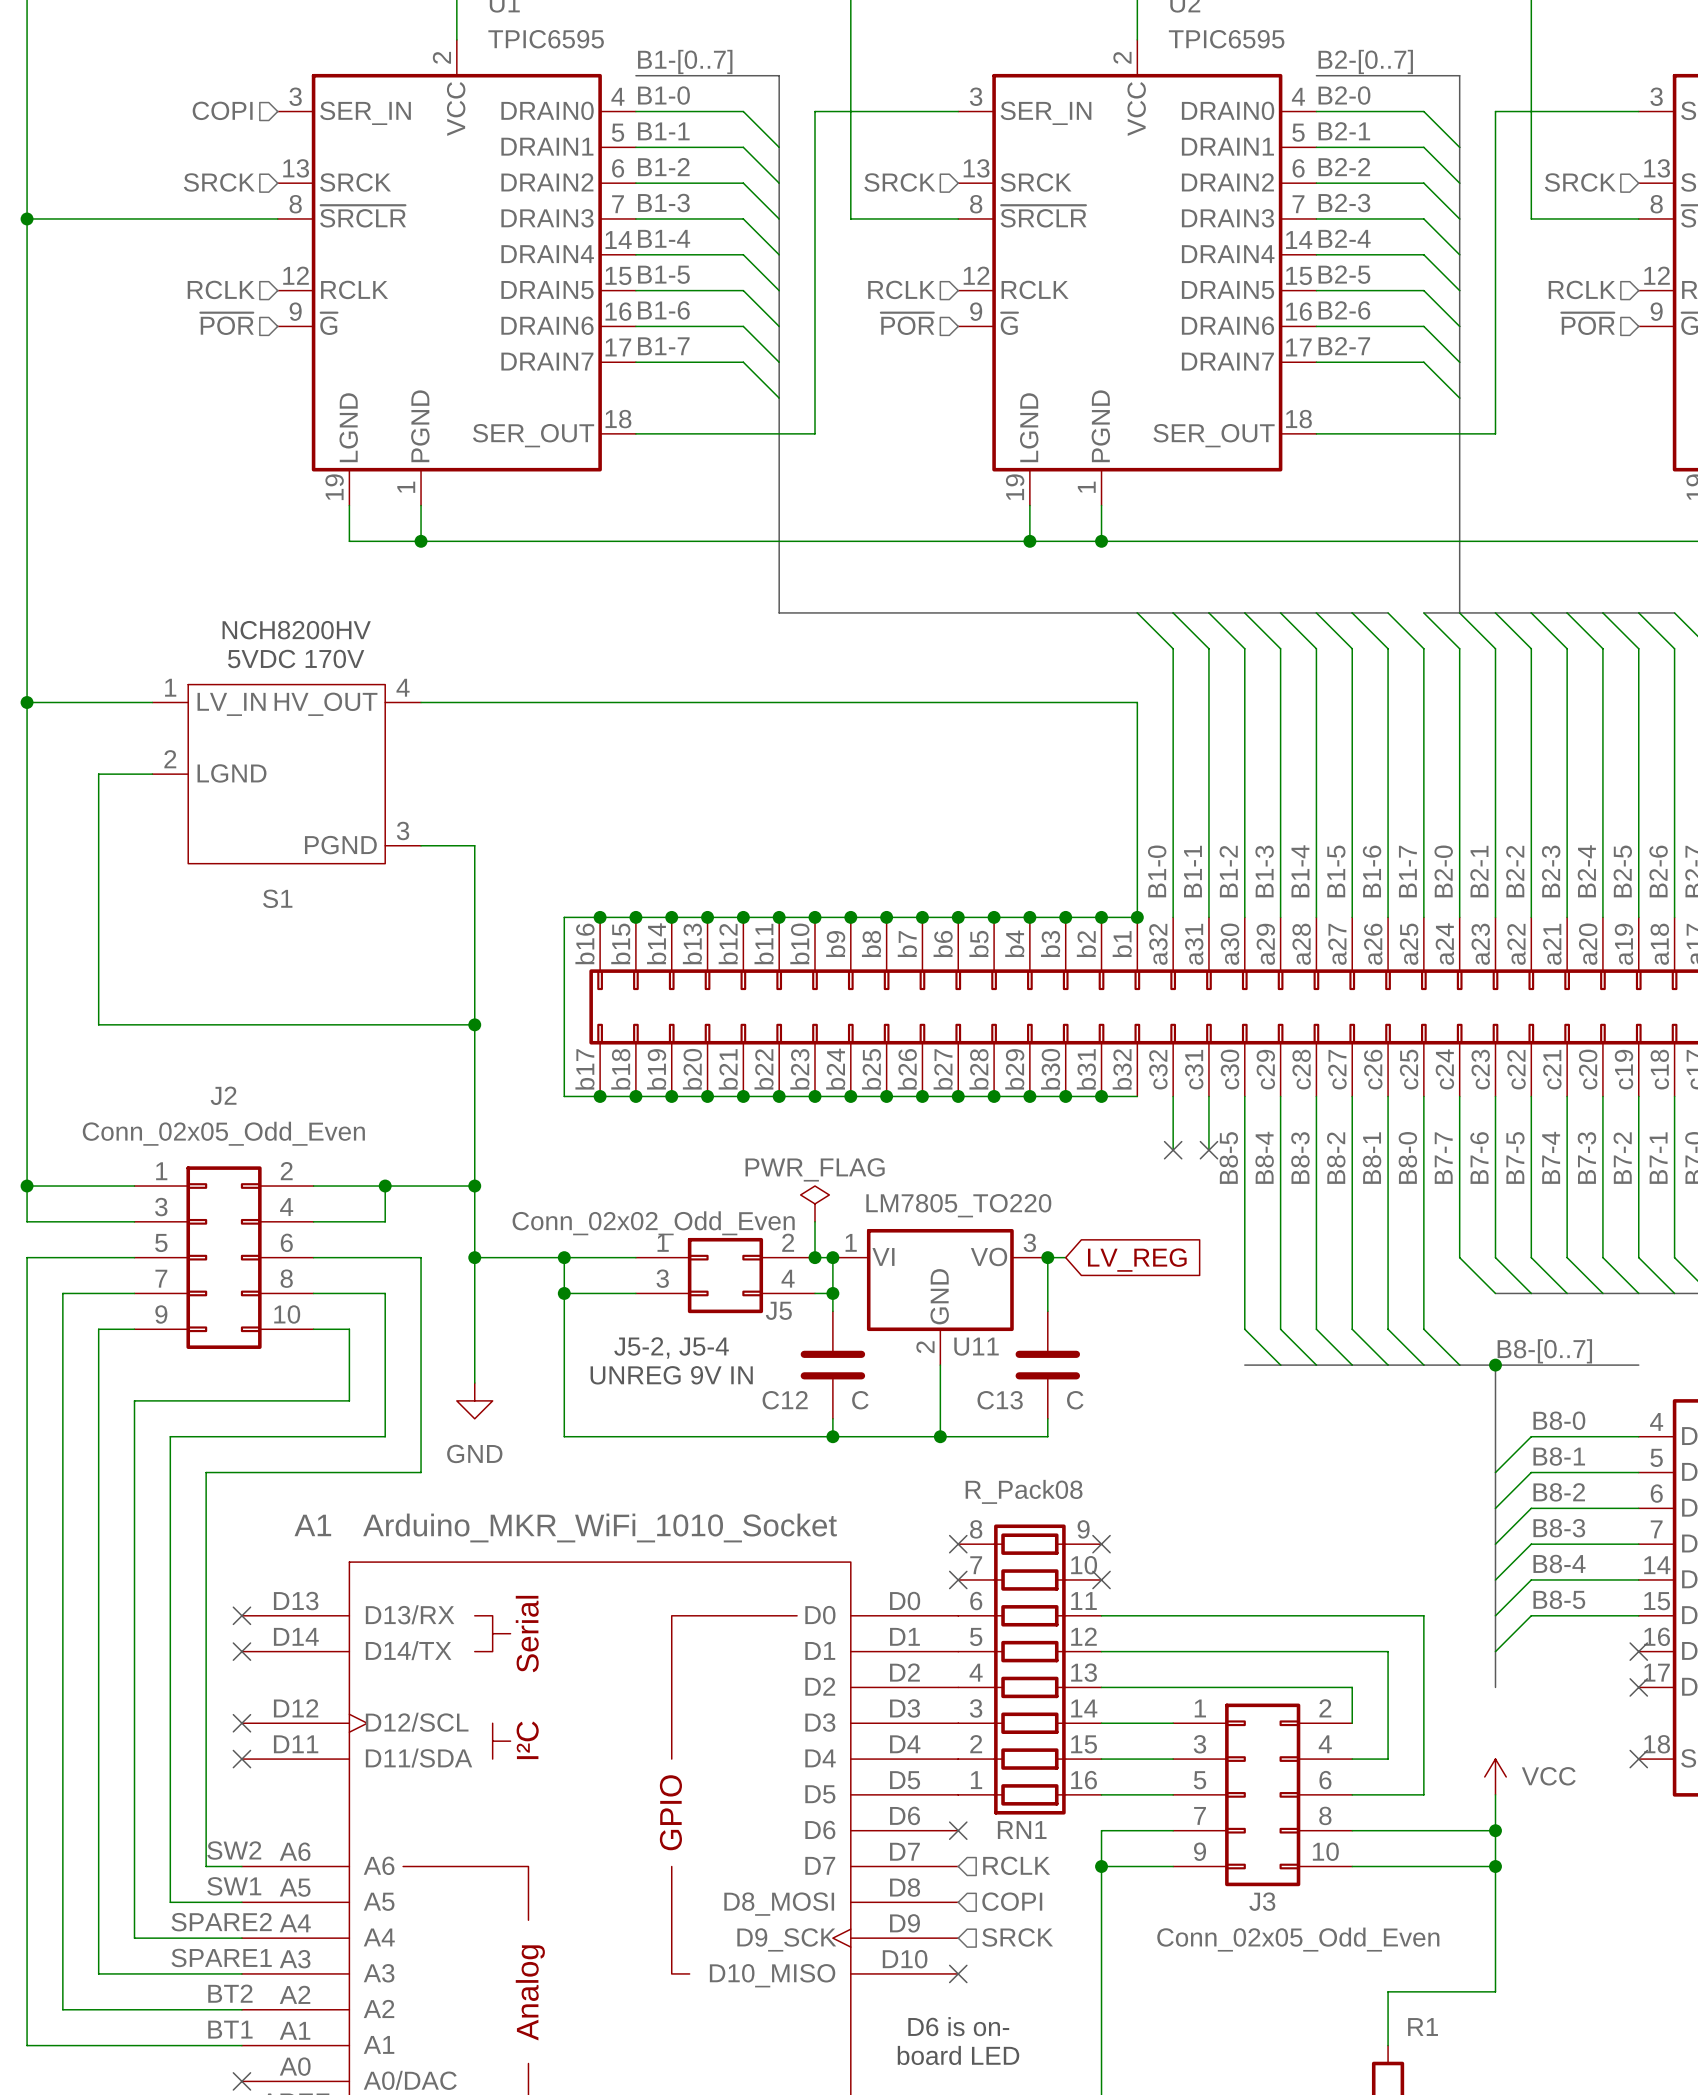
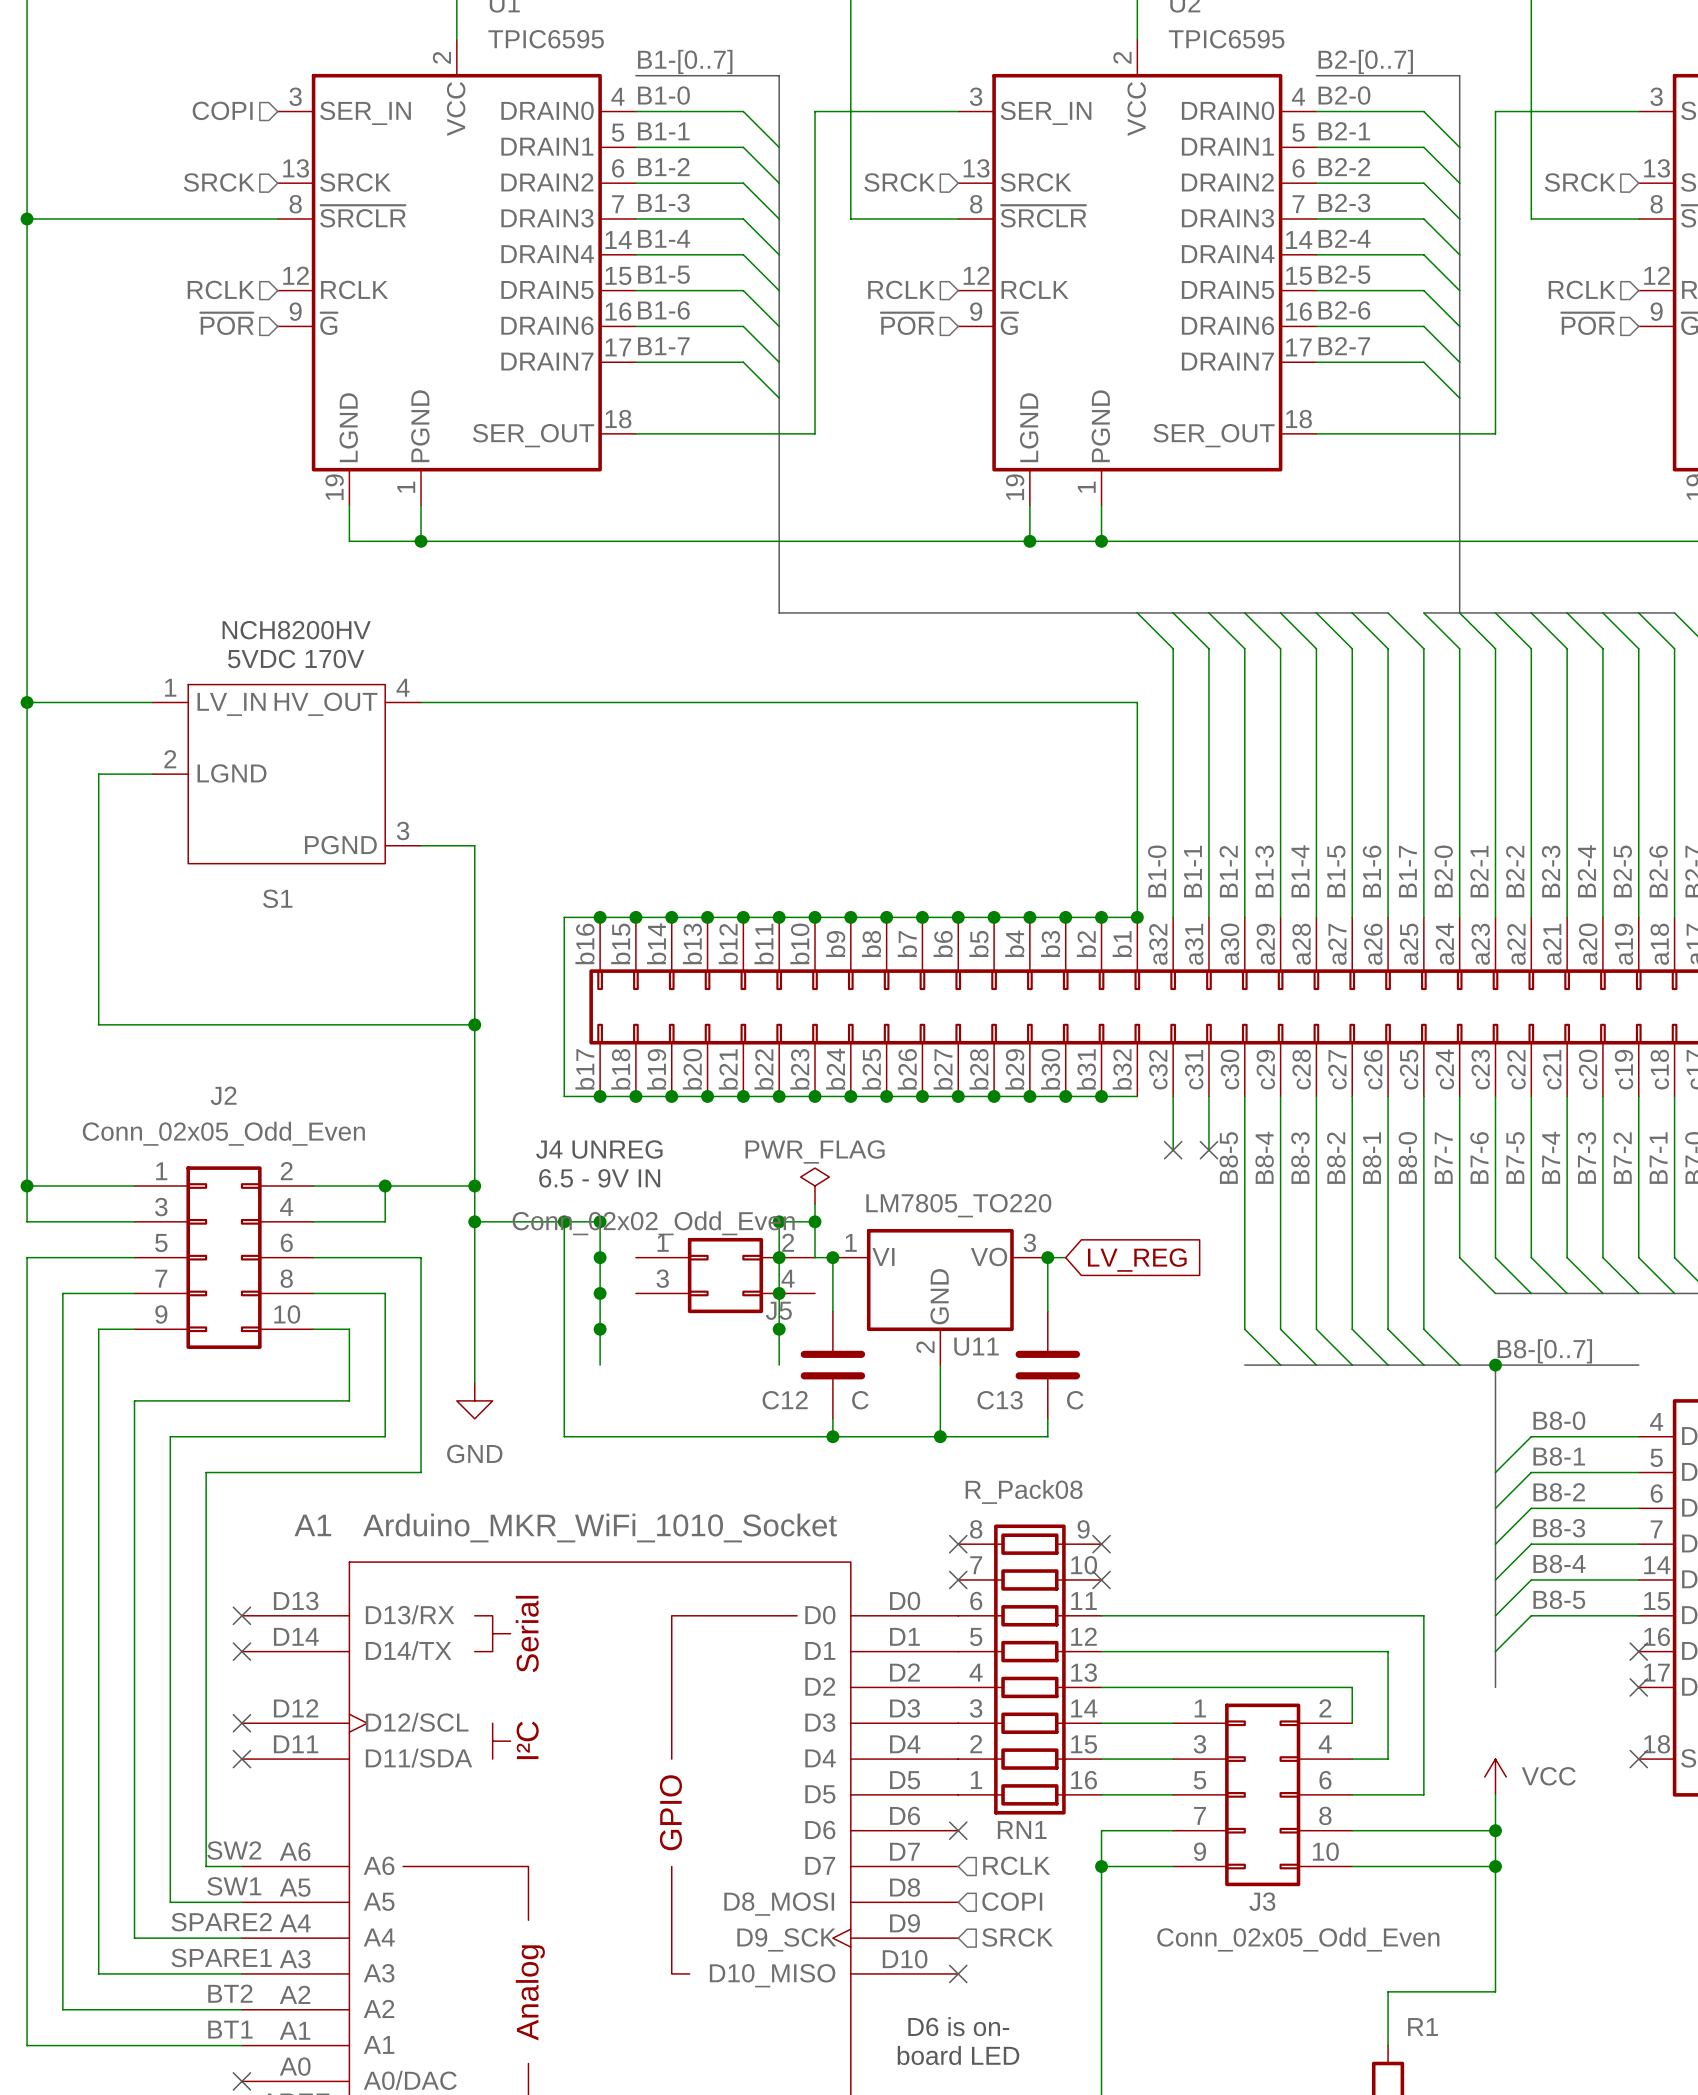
text: none -> J4 UNREG (599, 1149)
text: none -> 6.5 - 9V IN (599, 1178)
wire: none -> (814, 1203) (814, 1221) (779, 1221) (779, 1365)
power symbol position: PWR_FLAG (814, 1203) -> PWR_FLAG (814, 1186)
wire: none -> (474, 1221) (600, 1221) (600, 1365)
wire: none -> (564, 1221) (564, 1257)
junction: none -> (564, 1221)
junction: none -> (600, 1221)
junction: none -> (779, 1221)
junction: none -> (814, 1221)
wire: (474, 1257) (635, 1257) -> none
junction position: (474, 1257) -> (474, 1221)
junction: (564, 1257) -> none
junction: none -> (600, 1257)
junction: none -> (779, 1257)
junction: (814, 1257) -> none
wire: (564, 1293) (635, 1293) -> none
junction: (564, 1293) -> none
junction: none -> (600, 1293)
junction: none -> (779, 1293)
wire: (814, 1293) (832, 1293) -> none
junction: (832, 1293) -> none
junction: none -> (600, 1329)
junction: none -> (779, 1329)
text: J5-2, J5-4 (671, 1348) -> none
text: UNREG 9V IN (671, 1375) -> none

